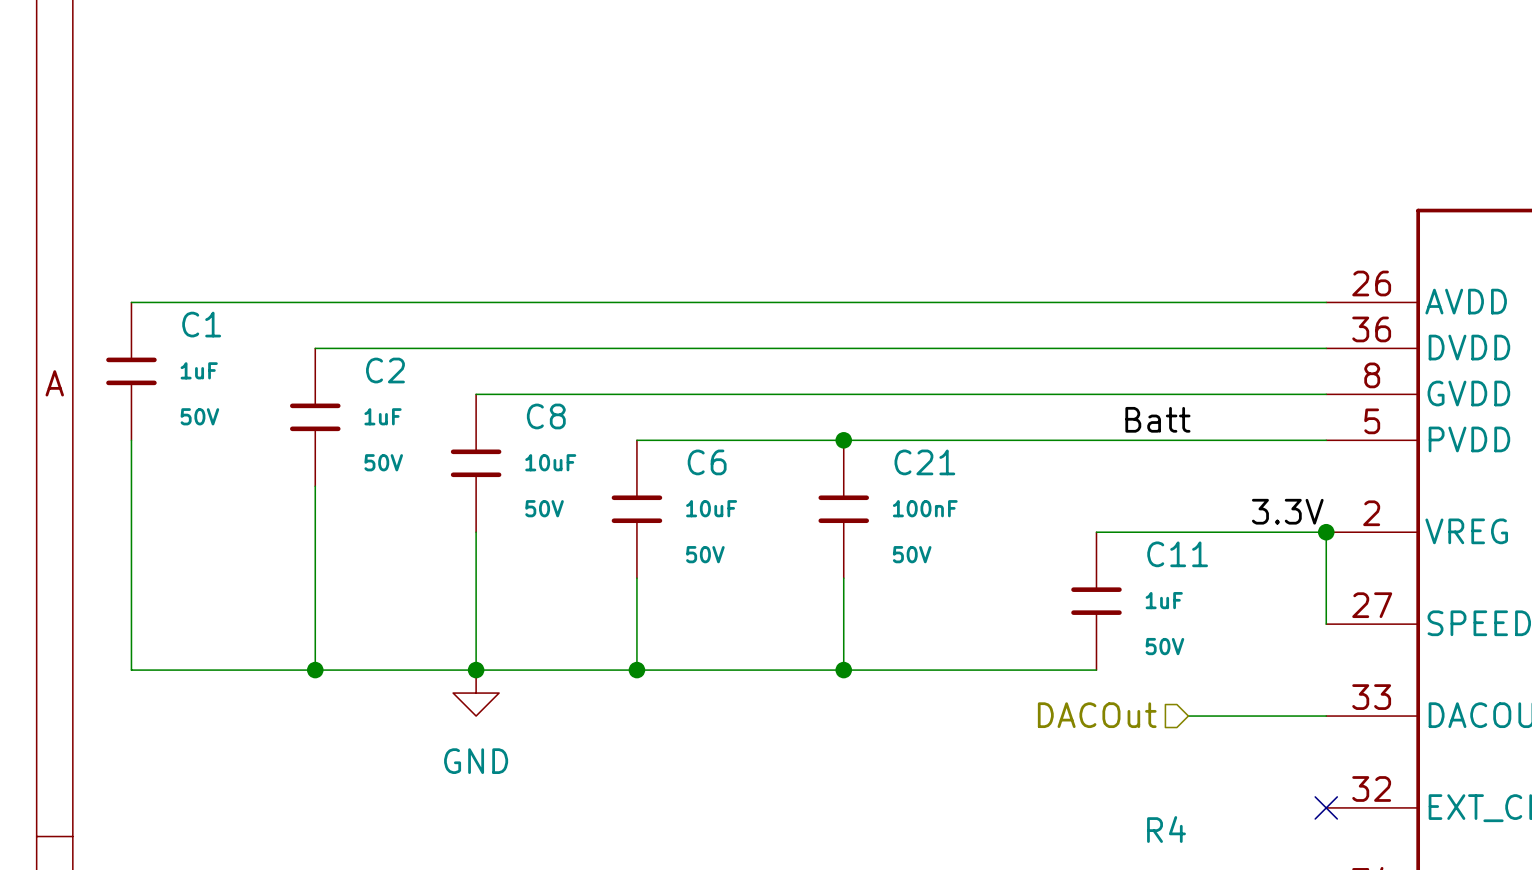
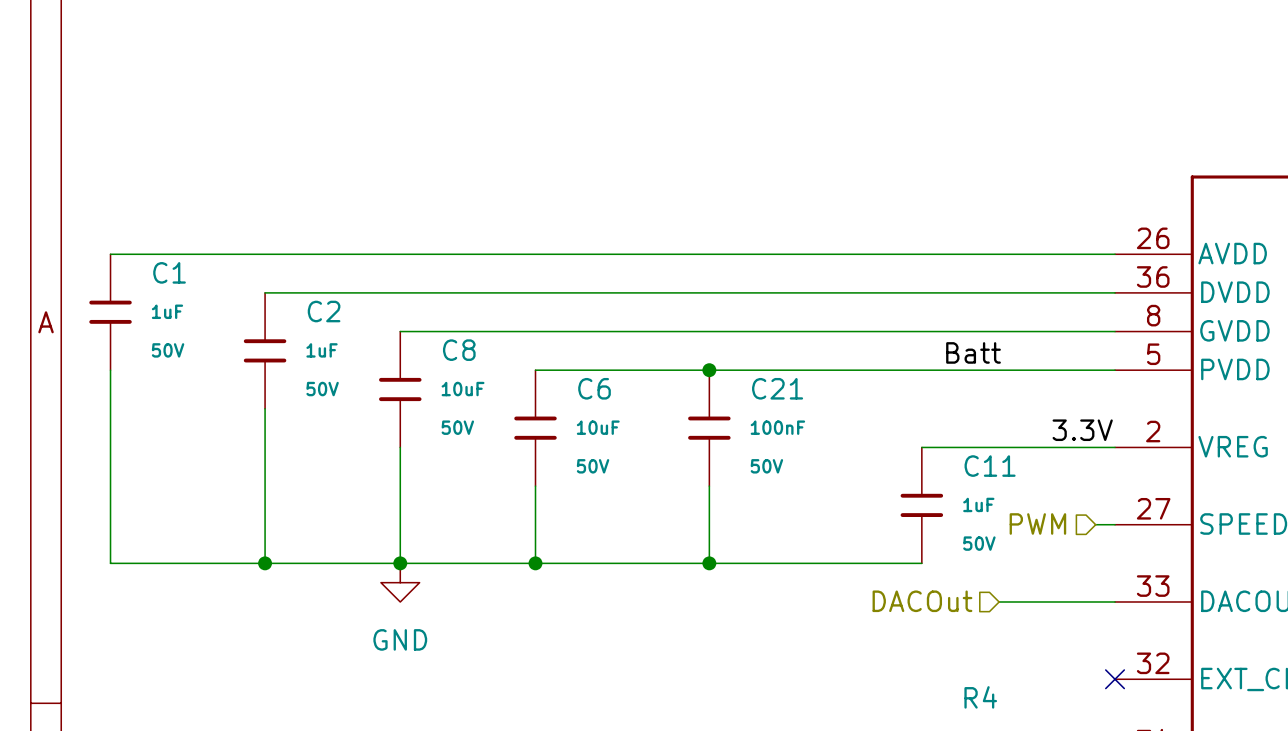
wire: (1326, 532) (1326, 624) -> (1095, 524) (1115, 524)
junction: (1326, 532) -> none
hierarchical label: none -> PWM (1037, 524)

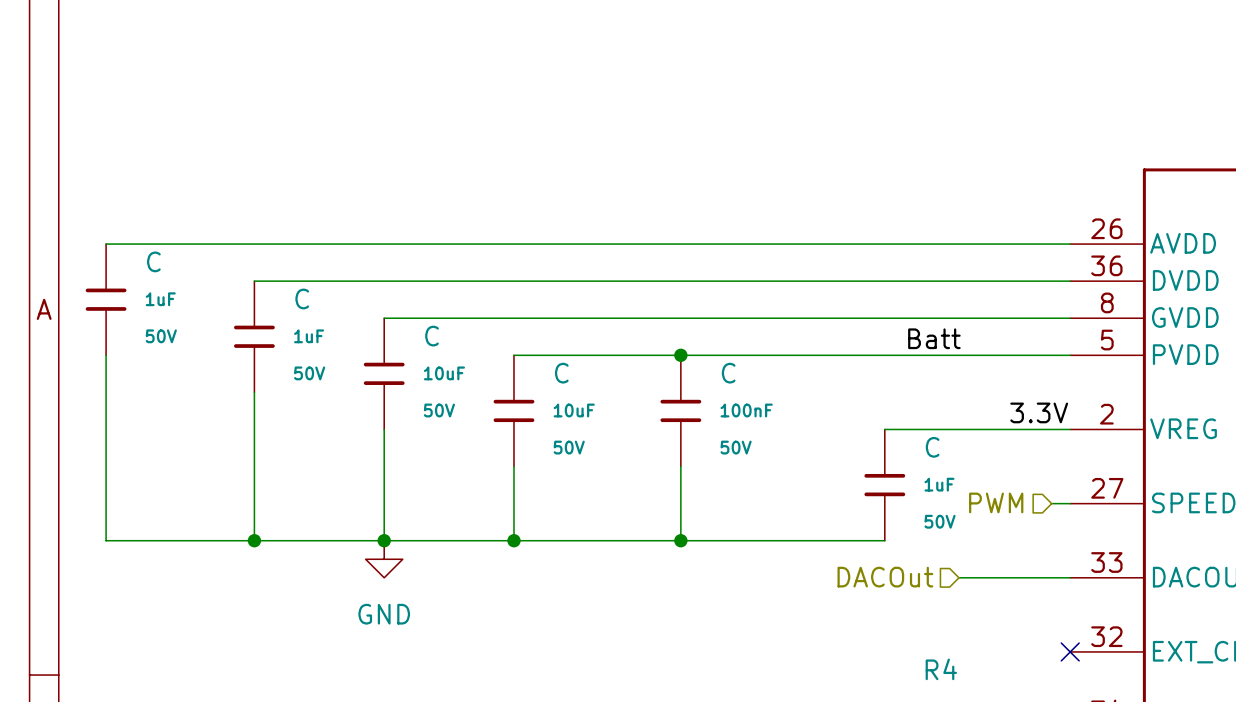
C1 name: C1 (169, 272) -> C (153, 261)
C2 name: C2 (324, 311) -> C (302, 298)
C8 name: C8 (459, 350) -> C (432, 336)
C6 name: C6 (594, 388) -> C (561, 373)
C21 name: C21 (777, 388) -> C (728, 373)
C11 name: C11 (990, 466) -> C (932, 447)

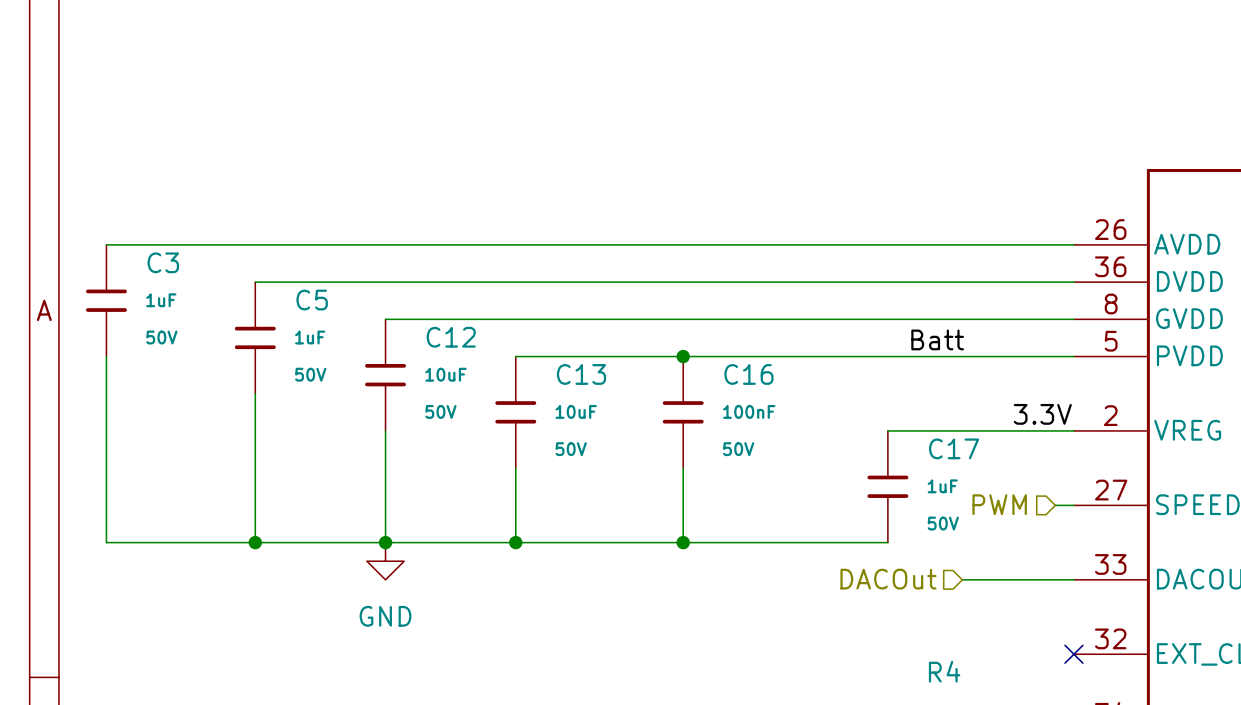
C name: C (153, 261) -> C3 (163, 262)
C name: C (302, 298) -> C5 (312, 300)
C name: C (432, 336) -> C12 (451, 337)
C name: C (561, 373) -> C13 (581, 374)
C name: C (728, 373) -> C16 (748, 374)
C name: C (932, 447) -> C17 (954, 448)

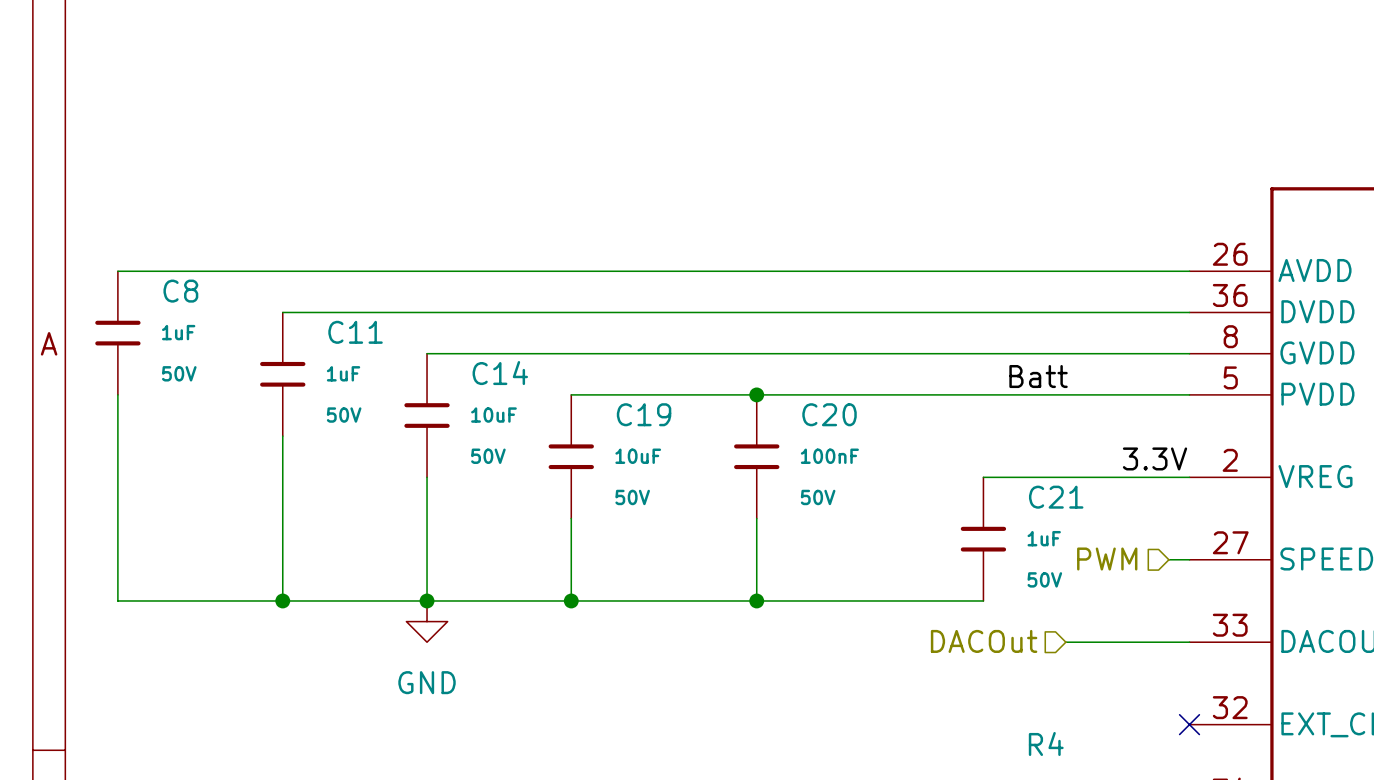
C3 name: C3 (163, 262) -> C8 (180, 291)
C5 name: C5 (312, 300) -> C11 (355, 332)
C12 name: C12 (451, 337) -> C14 (500, 373)
C13 name: C13 (581, 374) -> C19 (644, 414)
C16 name: C16 (748, 374) -> C20 (829, 414)
C17 name: C17 (954, 448) -> C21 (1056, 497)

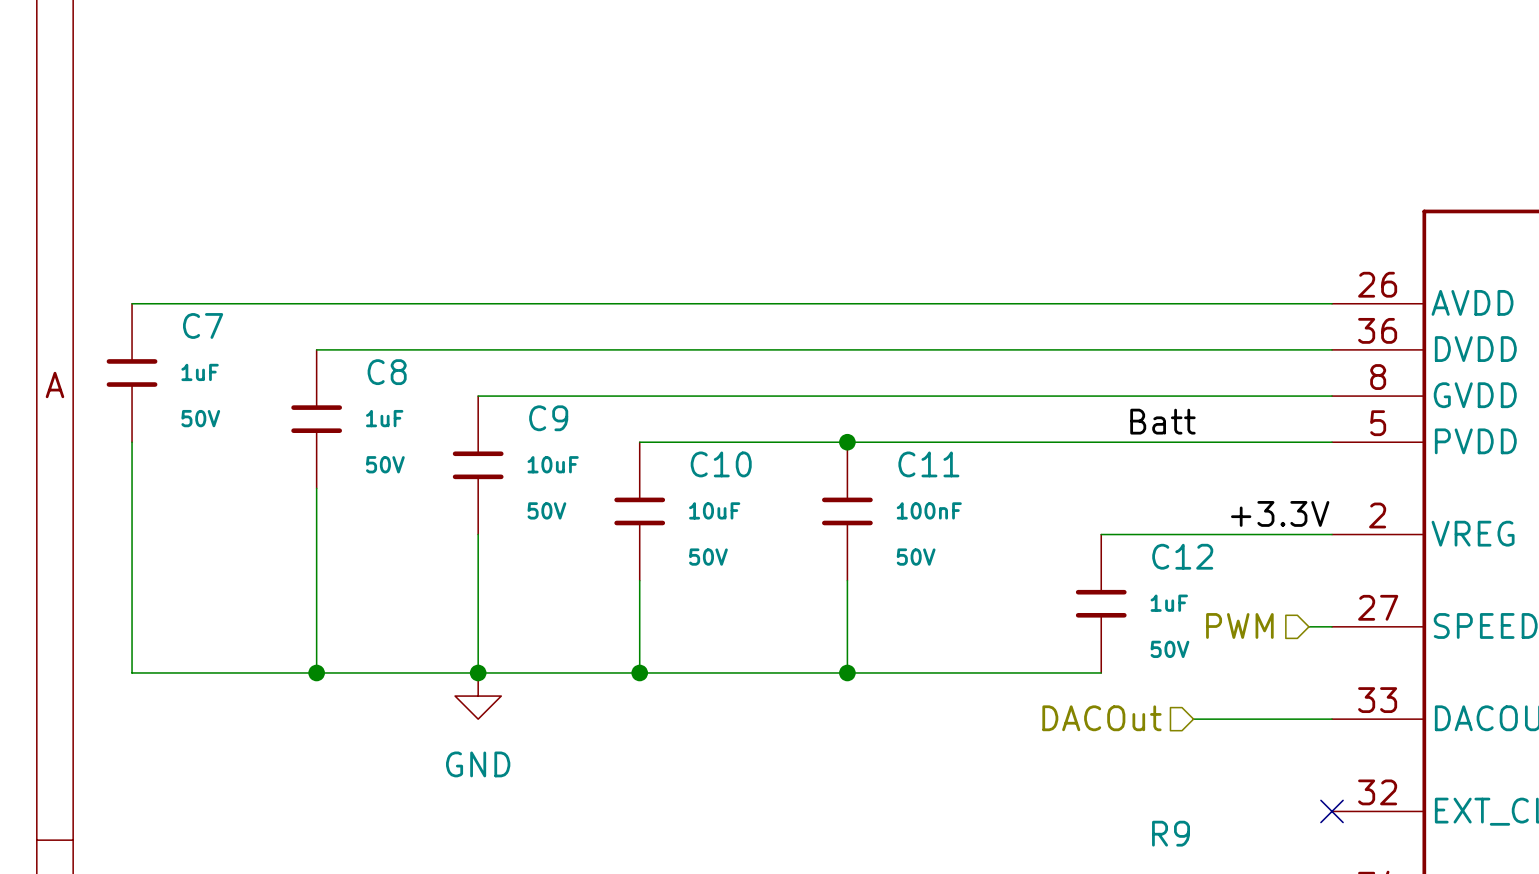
C8 name: C8 (180, 291) -> C7 (203, 325)
C11 name: C11 (355, 332) -> C8 (387, 372)
C14 name: C14 (500, 373) -> C9 (548, 418)
C19 name: C19 (644, 414) -> C10 (721, 464)
C20 name: C20 (829, 414) -> C11 (928, 464)
label: 3.3V (1155, 458) -> +3.3V (1280, 513)
C21 name: C21 (1056, 497) -> C12 (1182, 556)
R4 name: R4 (1046, 743) -> R9 (1171, 833)

